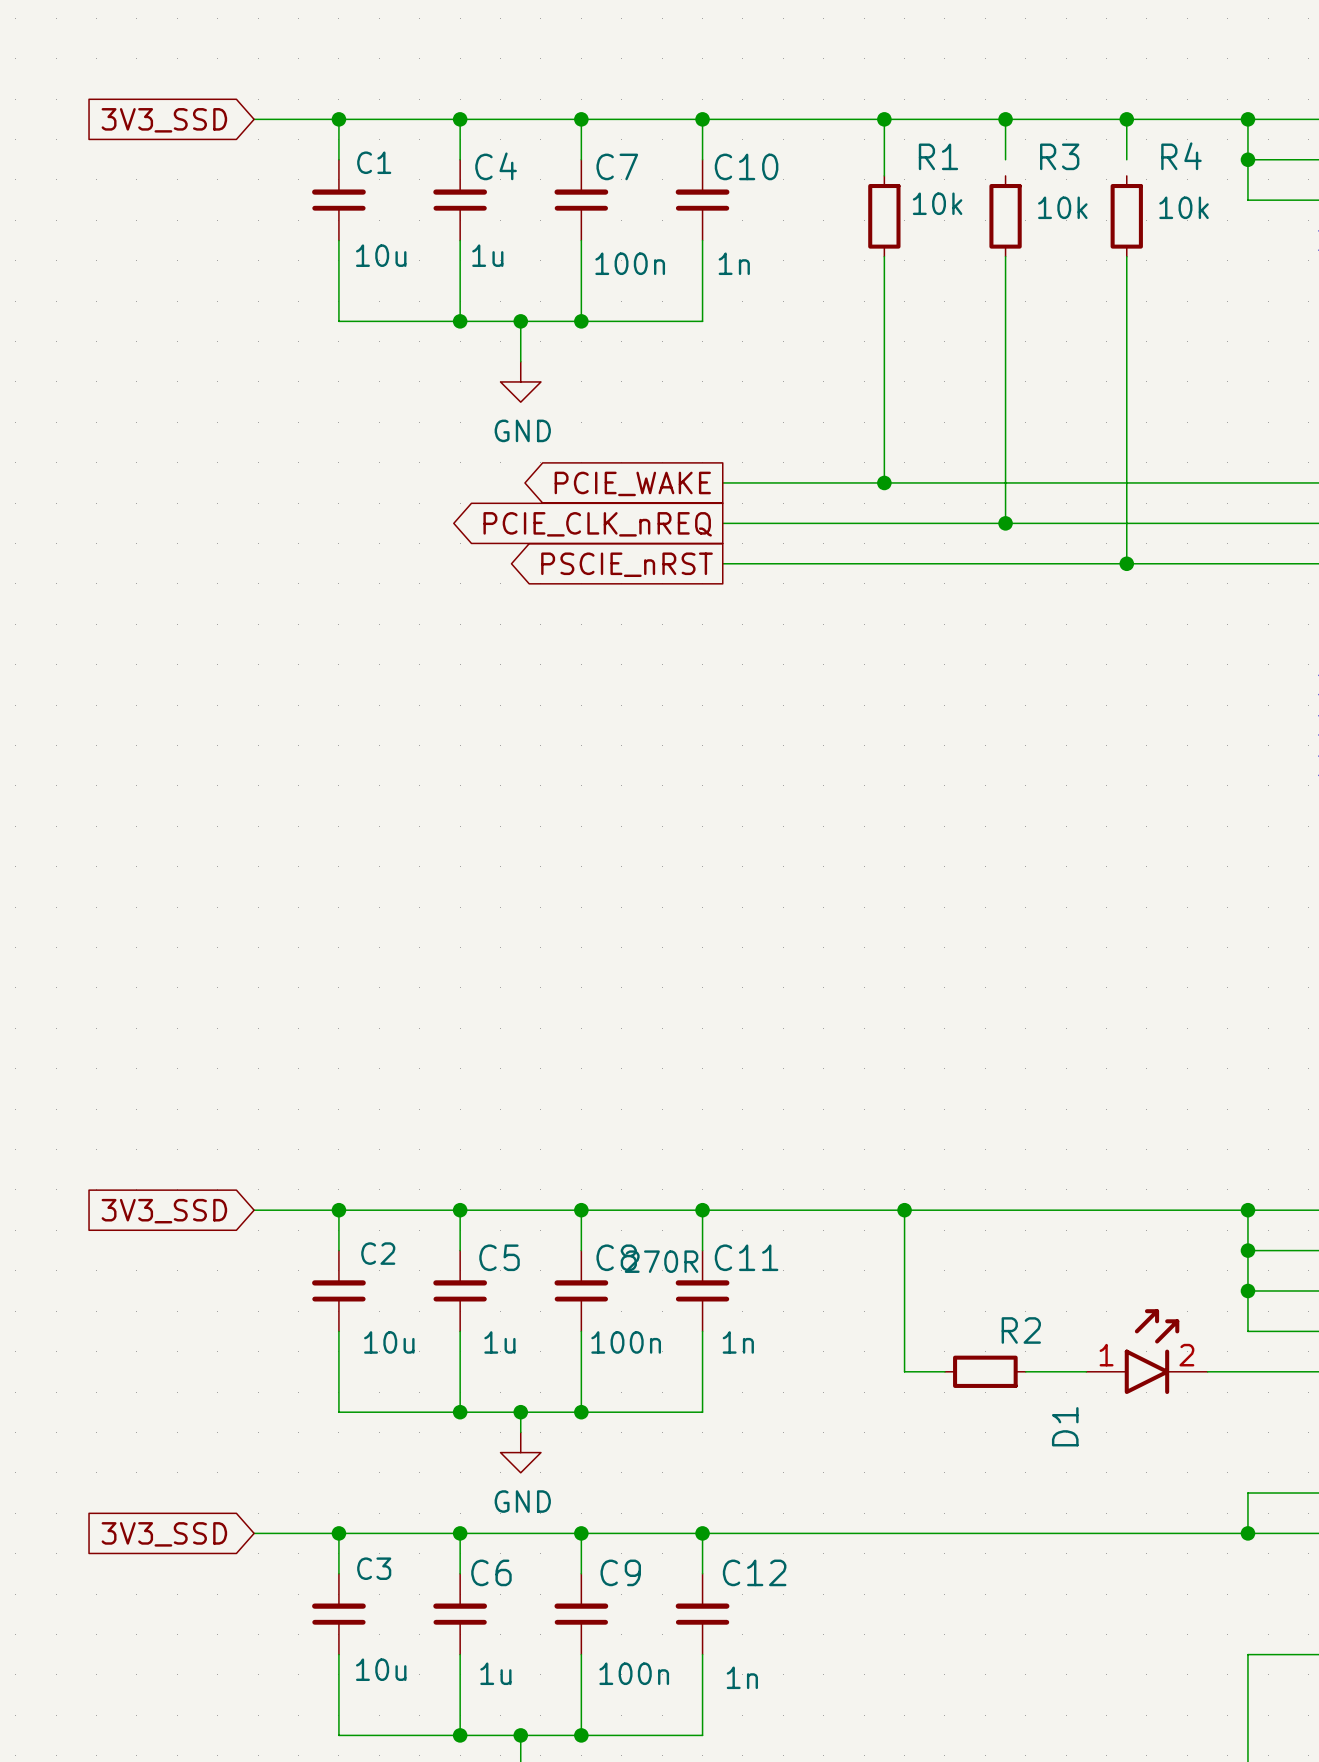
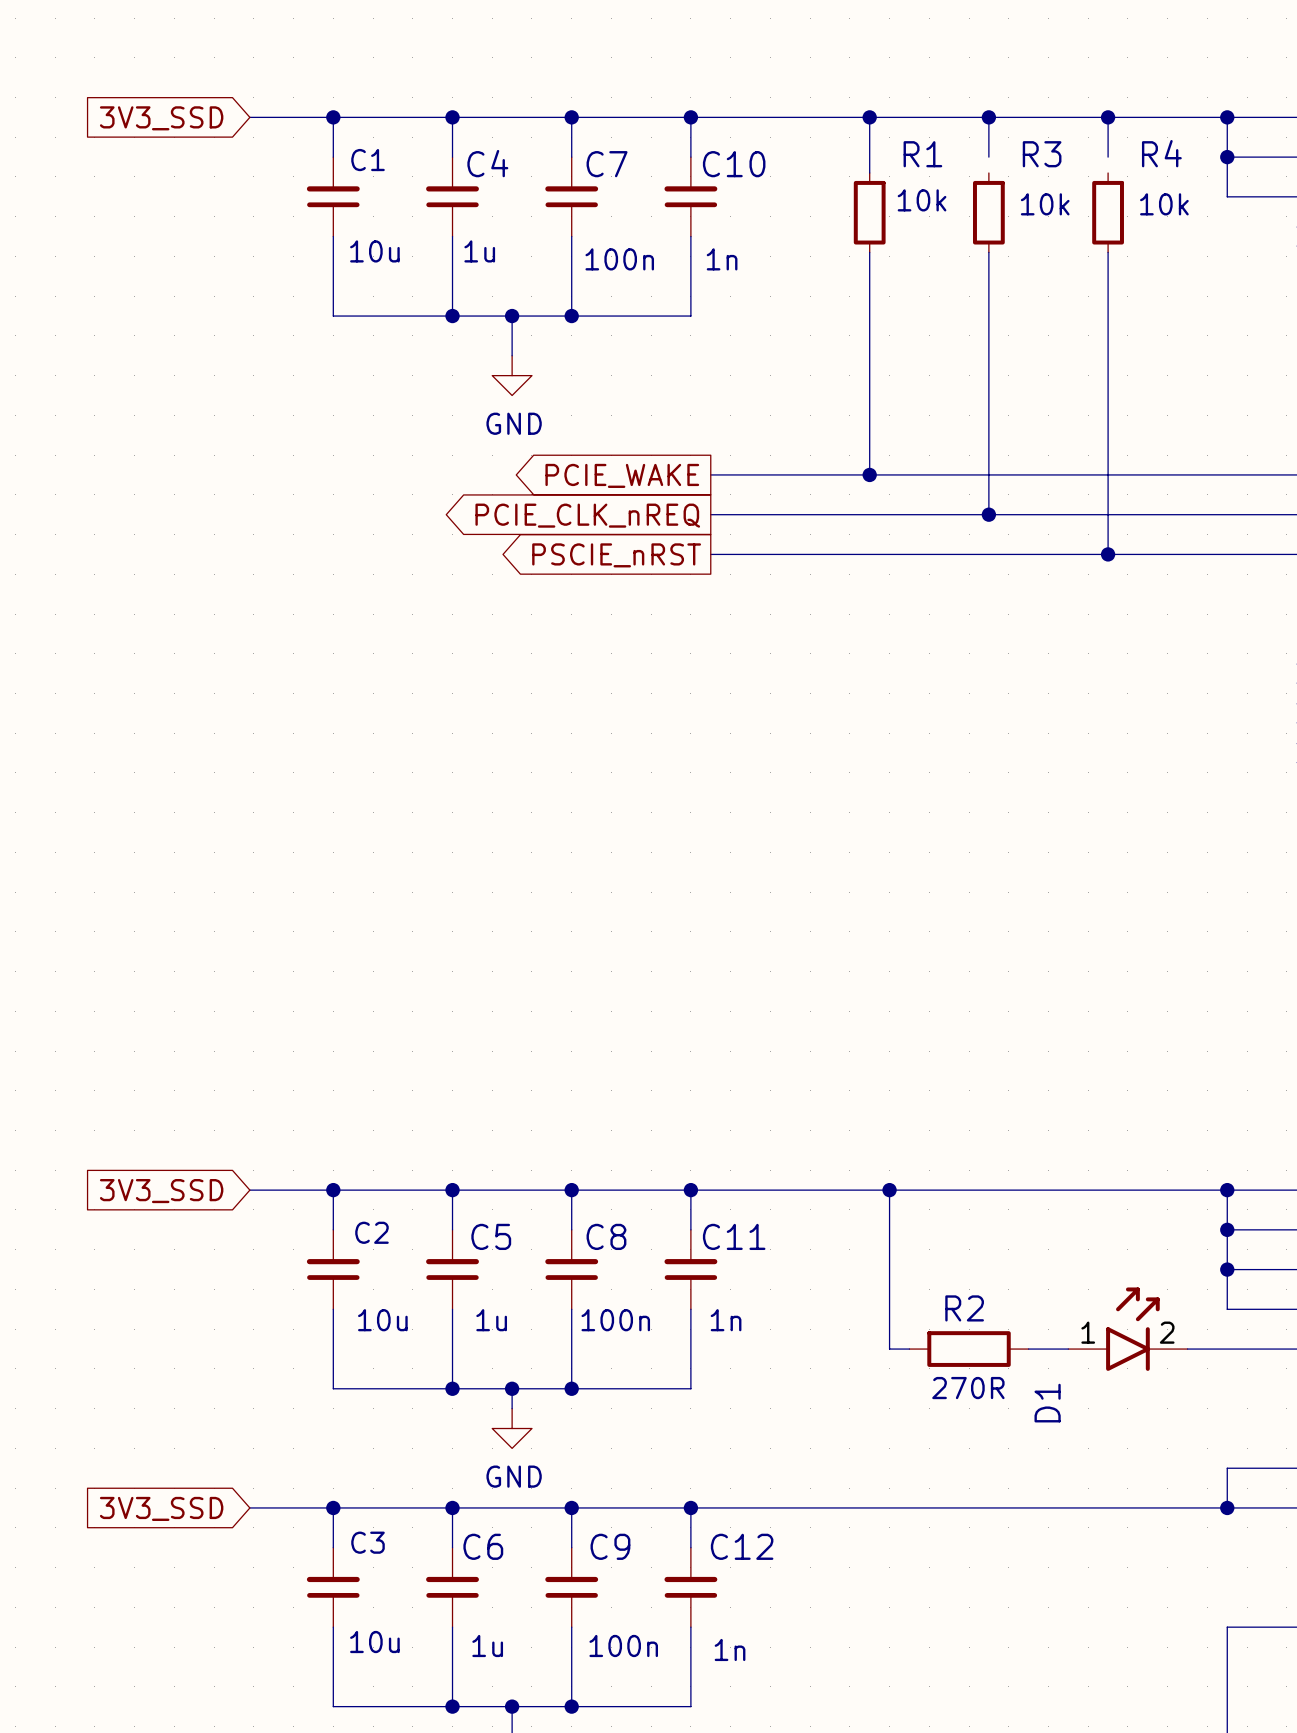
R2 text position: 270R (661, 1261) -> 270R (968, 1388)
R2 name position: R2 (1021, 1330) -> R2 (964, 1308)
R2 symbol: [944, 1355, 1026, 1388] -> [909, 1331, 1029, 1367]

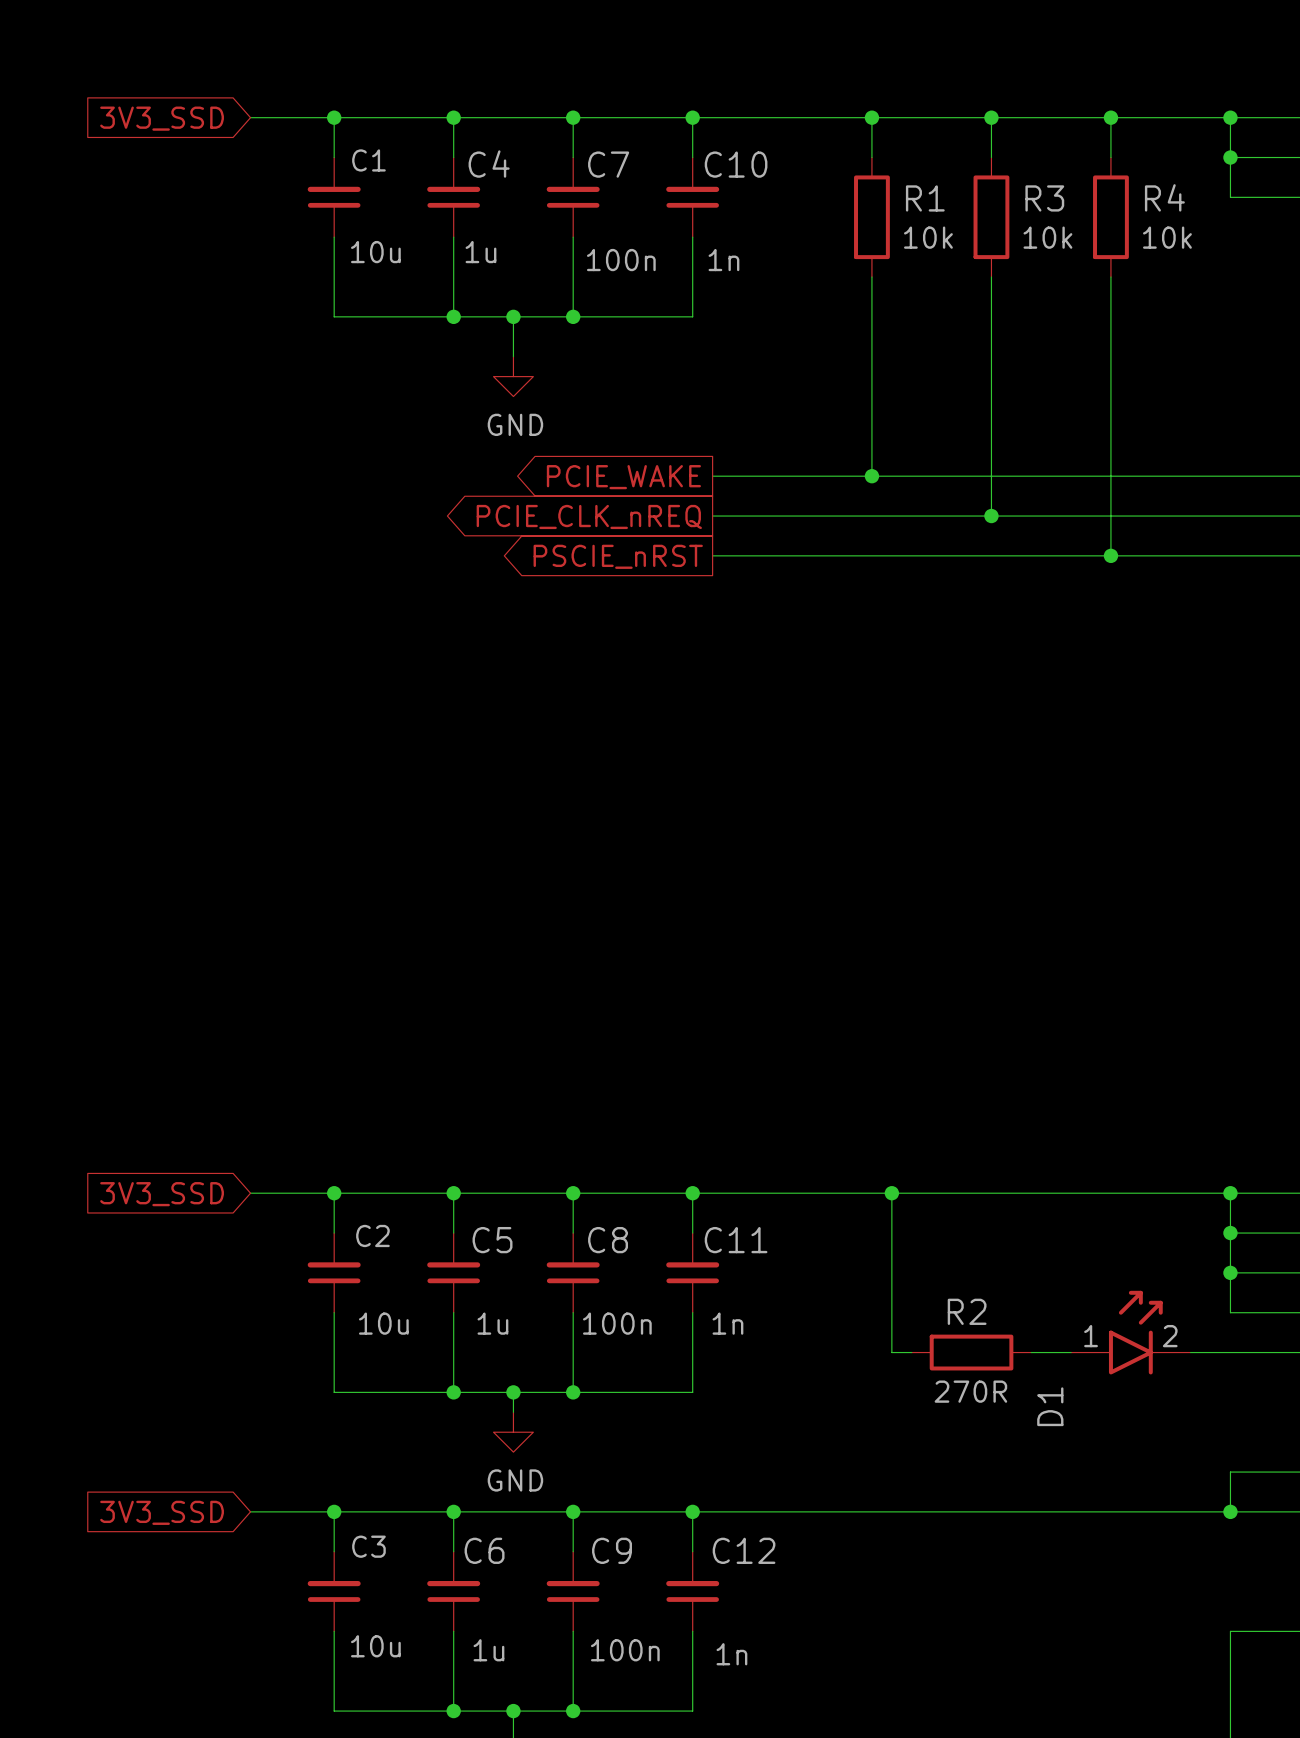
R4 name position: R4 (1161, 153) -> R4 (1164, 197)
R1 name position: R1 (922, 154) -> R1 (925, 198)
R3 name position: R3 (1042, 154) -> R3 (1044, 198)
R1 symbol: [853, 173, 886, 253] -> [854, 157, 890, 278]
R3 symbol: [972, 173, 1005, 253] -> [973, 157, 1010, 278]
R4 symbol: [1092, 173, 1124, 253] -> [1093, 157, 1129, 278]
R1 text position: 10k (922, 200) -> 10k (928, 237)

